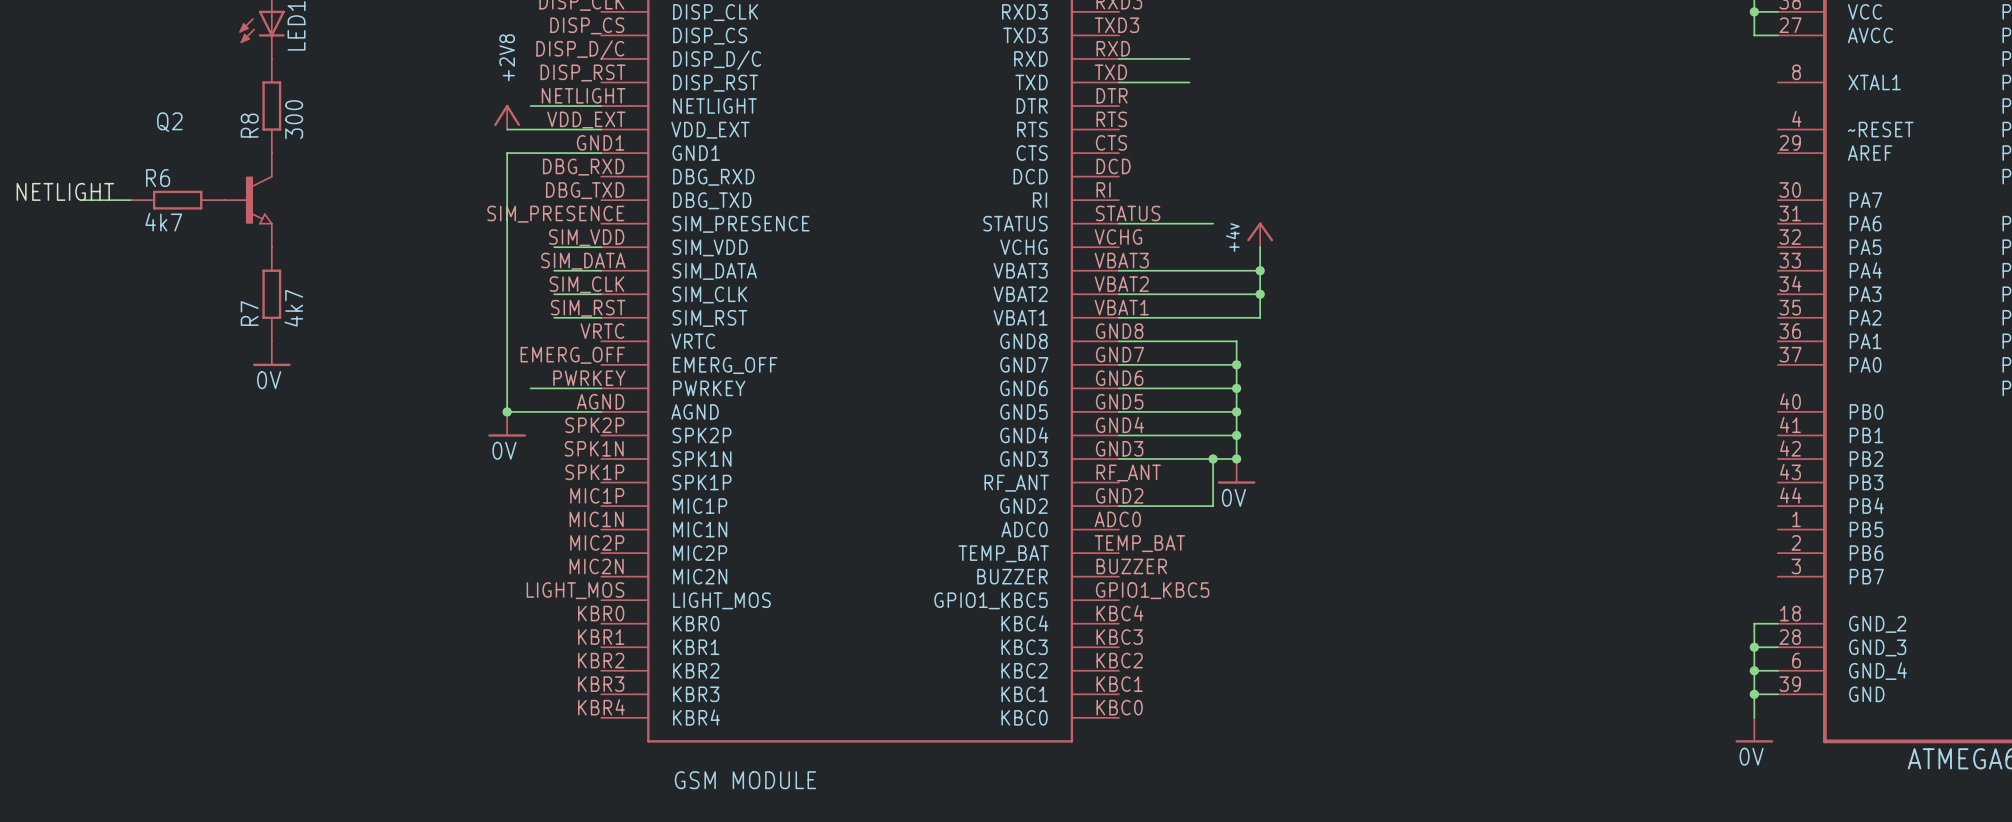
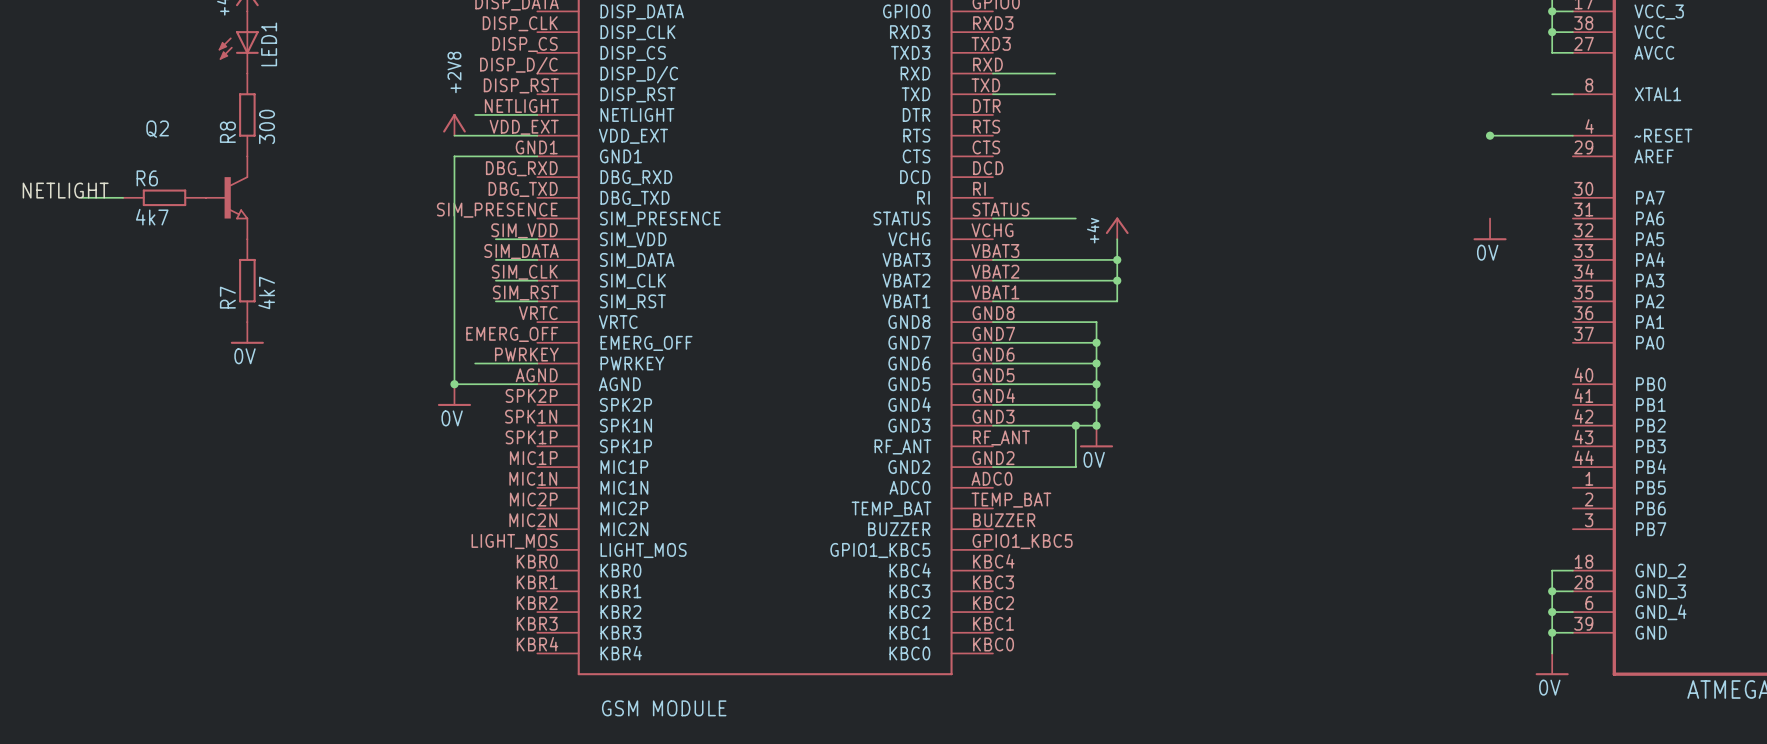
wire: none -> (1552, 94) (1572, 94)
wire: none -> (1490, 135) (1572, 135)
junction: none -> (1490, 135)
power symbol: none -> 0V (1490, 229)

